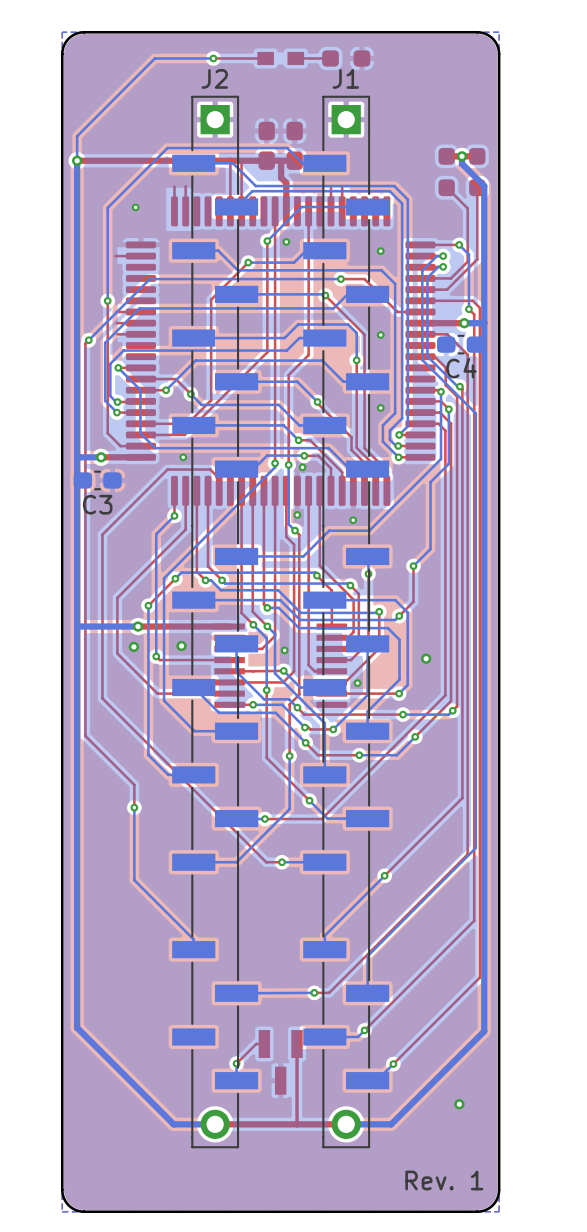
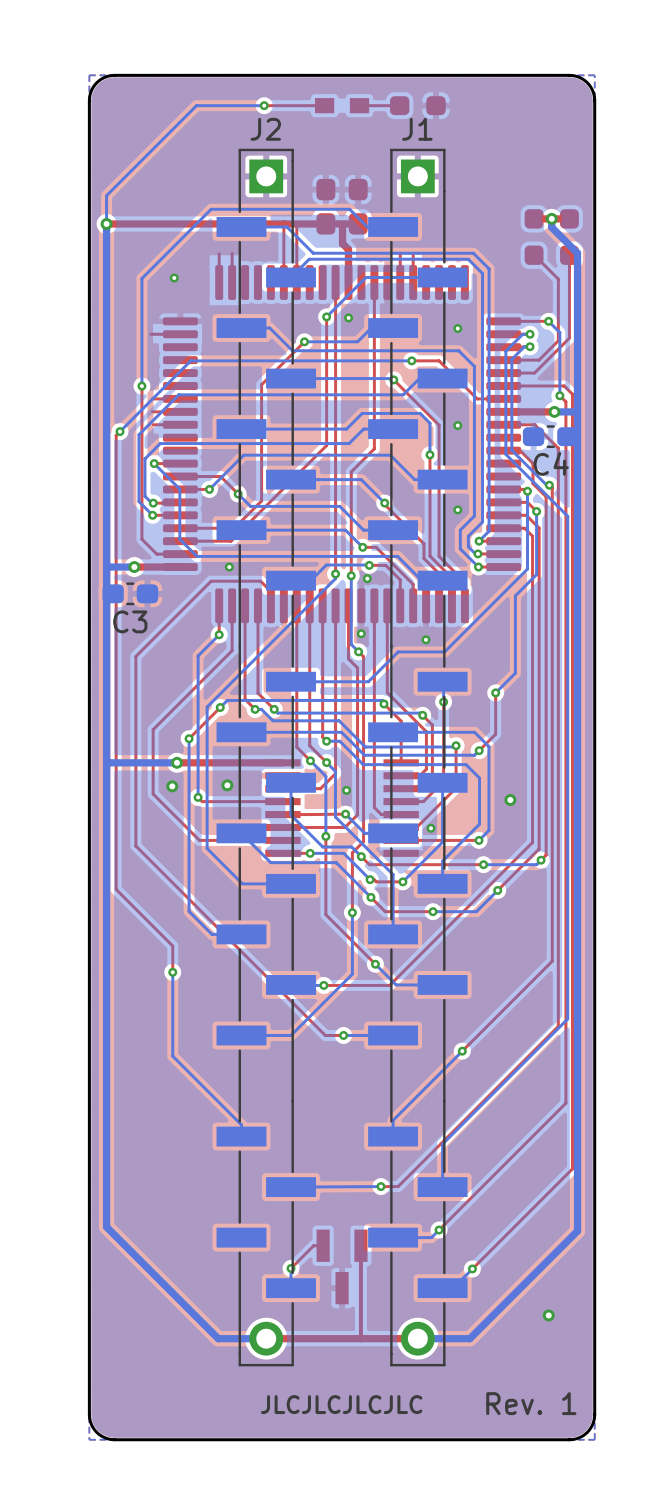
text: none -> JLCJLCJLCJLC (341, 1404)

